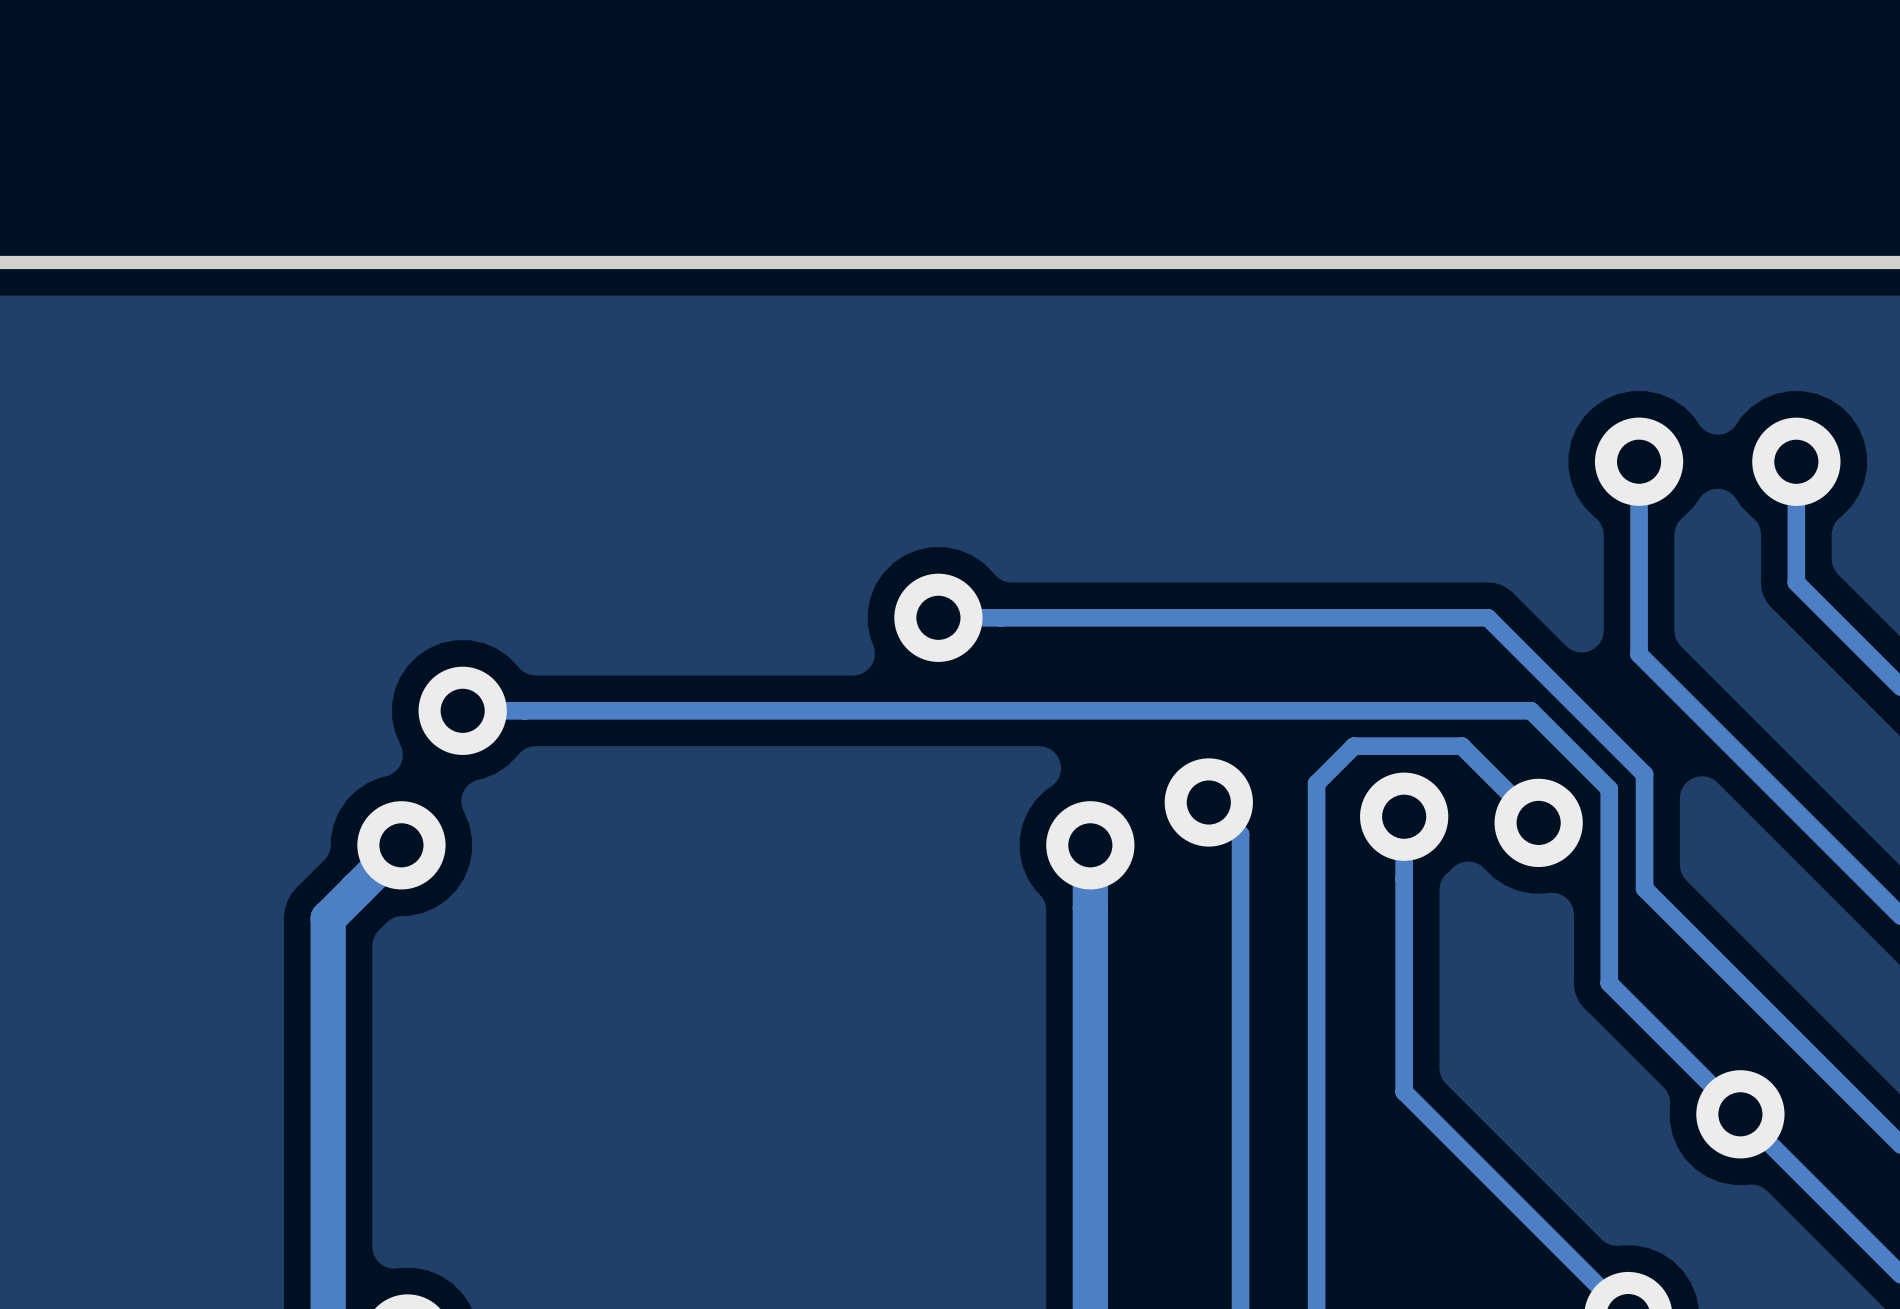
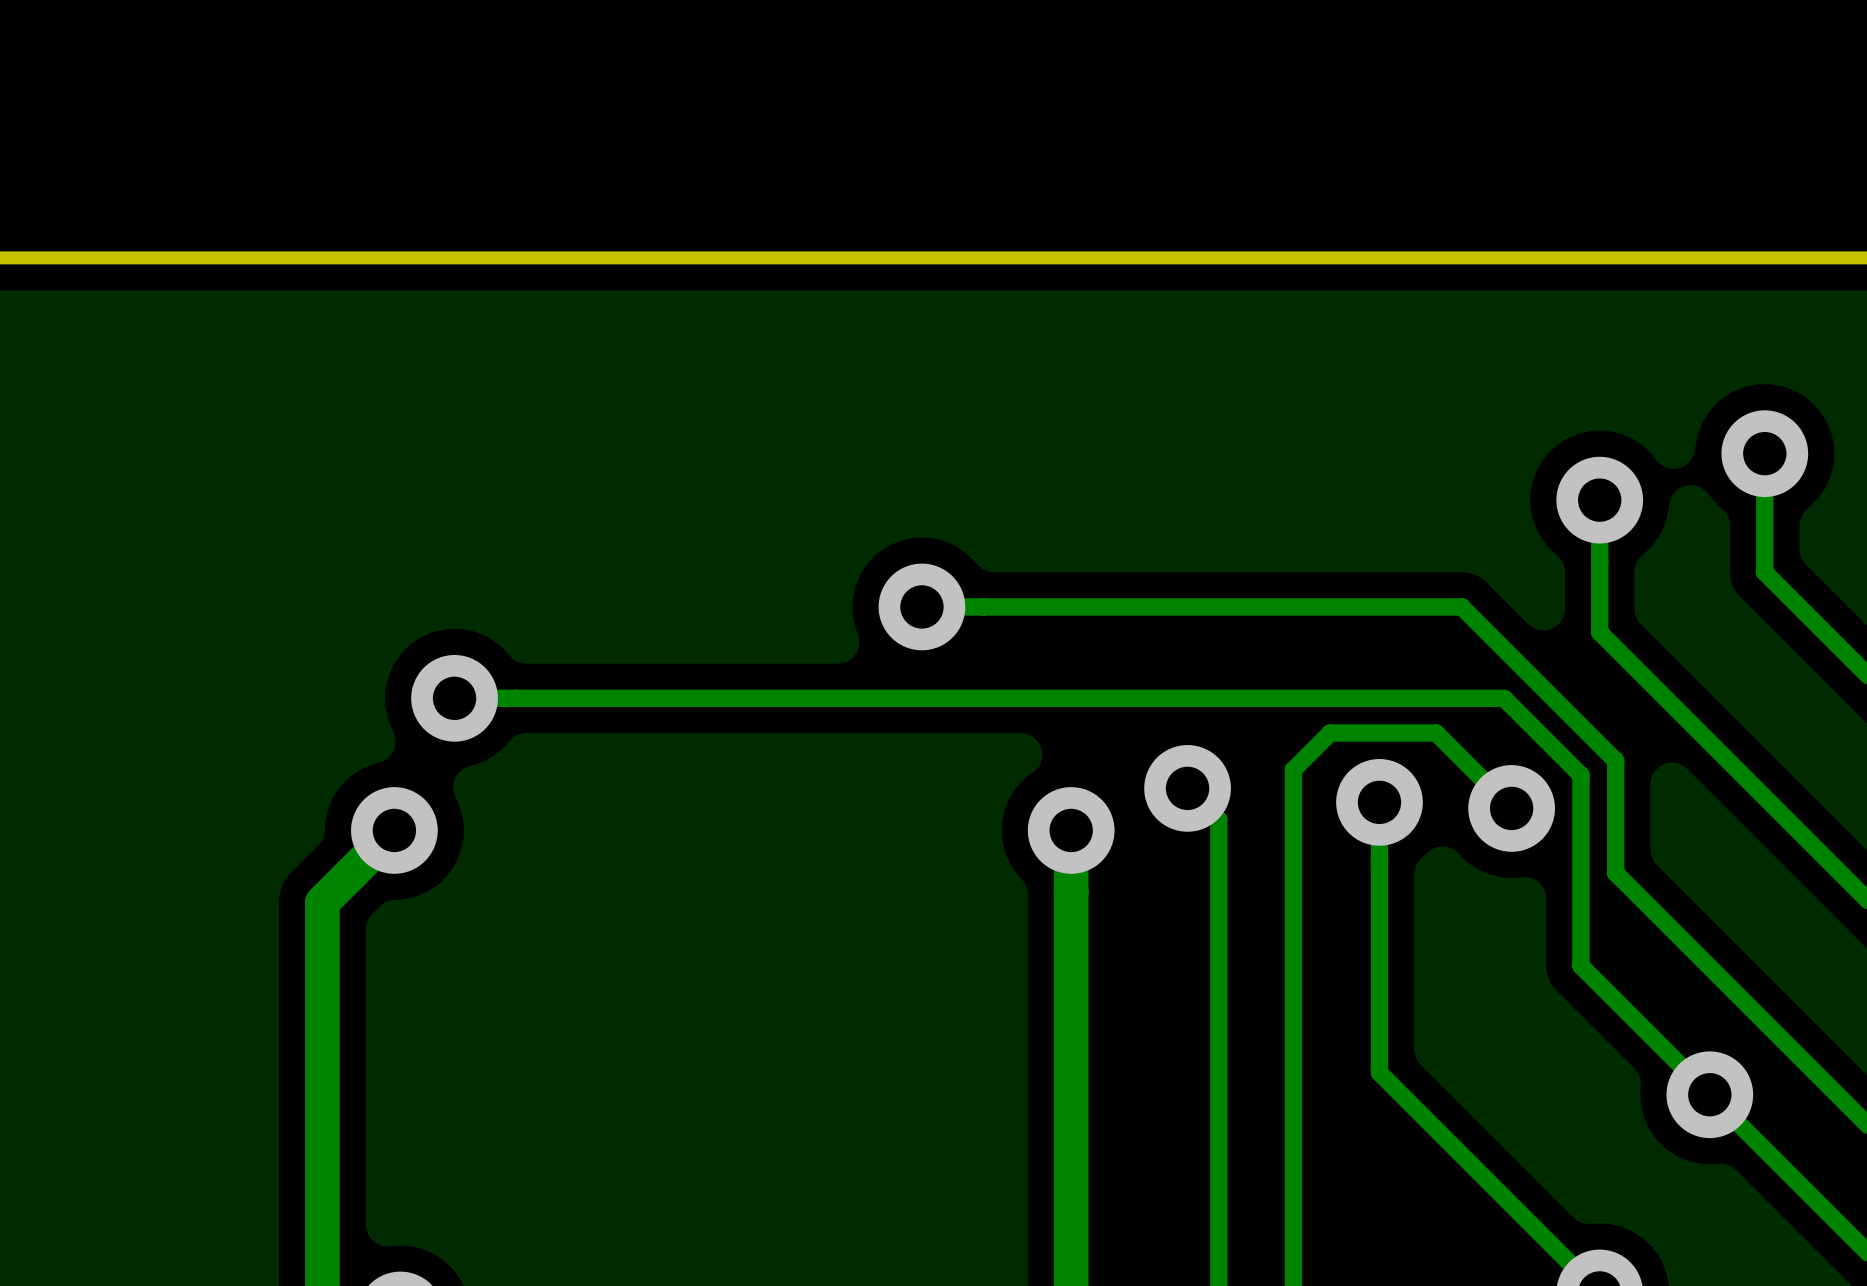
track: (1639, 461) (1639, 654) -> (1599, 500) (1599, 632) (1610, 642)
via position: (1639, 461) -> (1599, 500)

